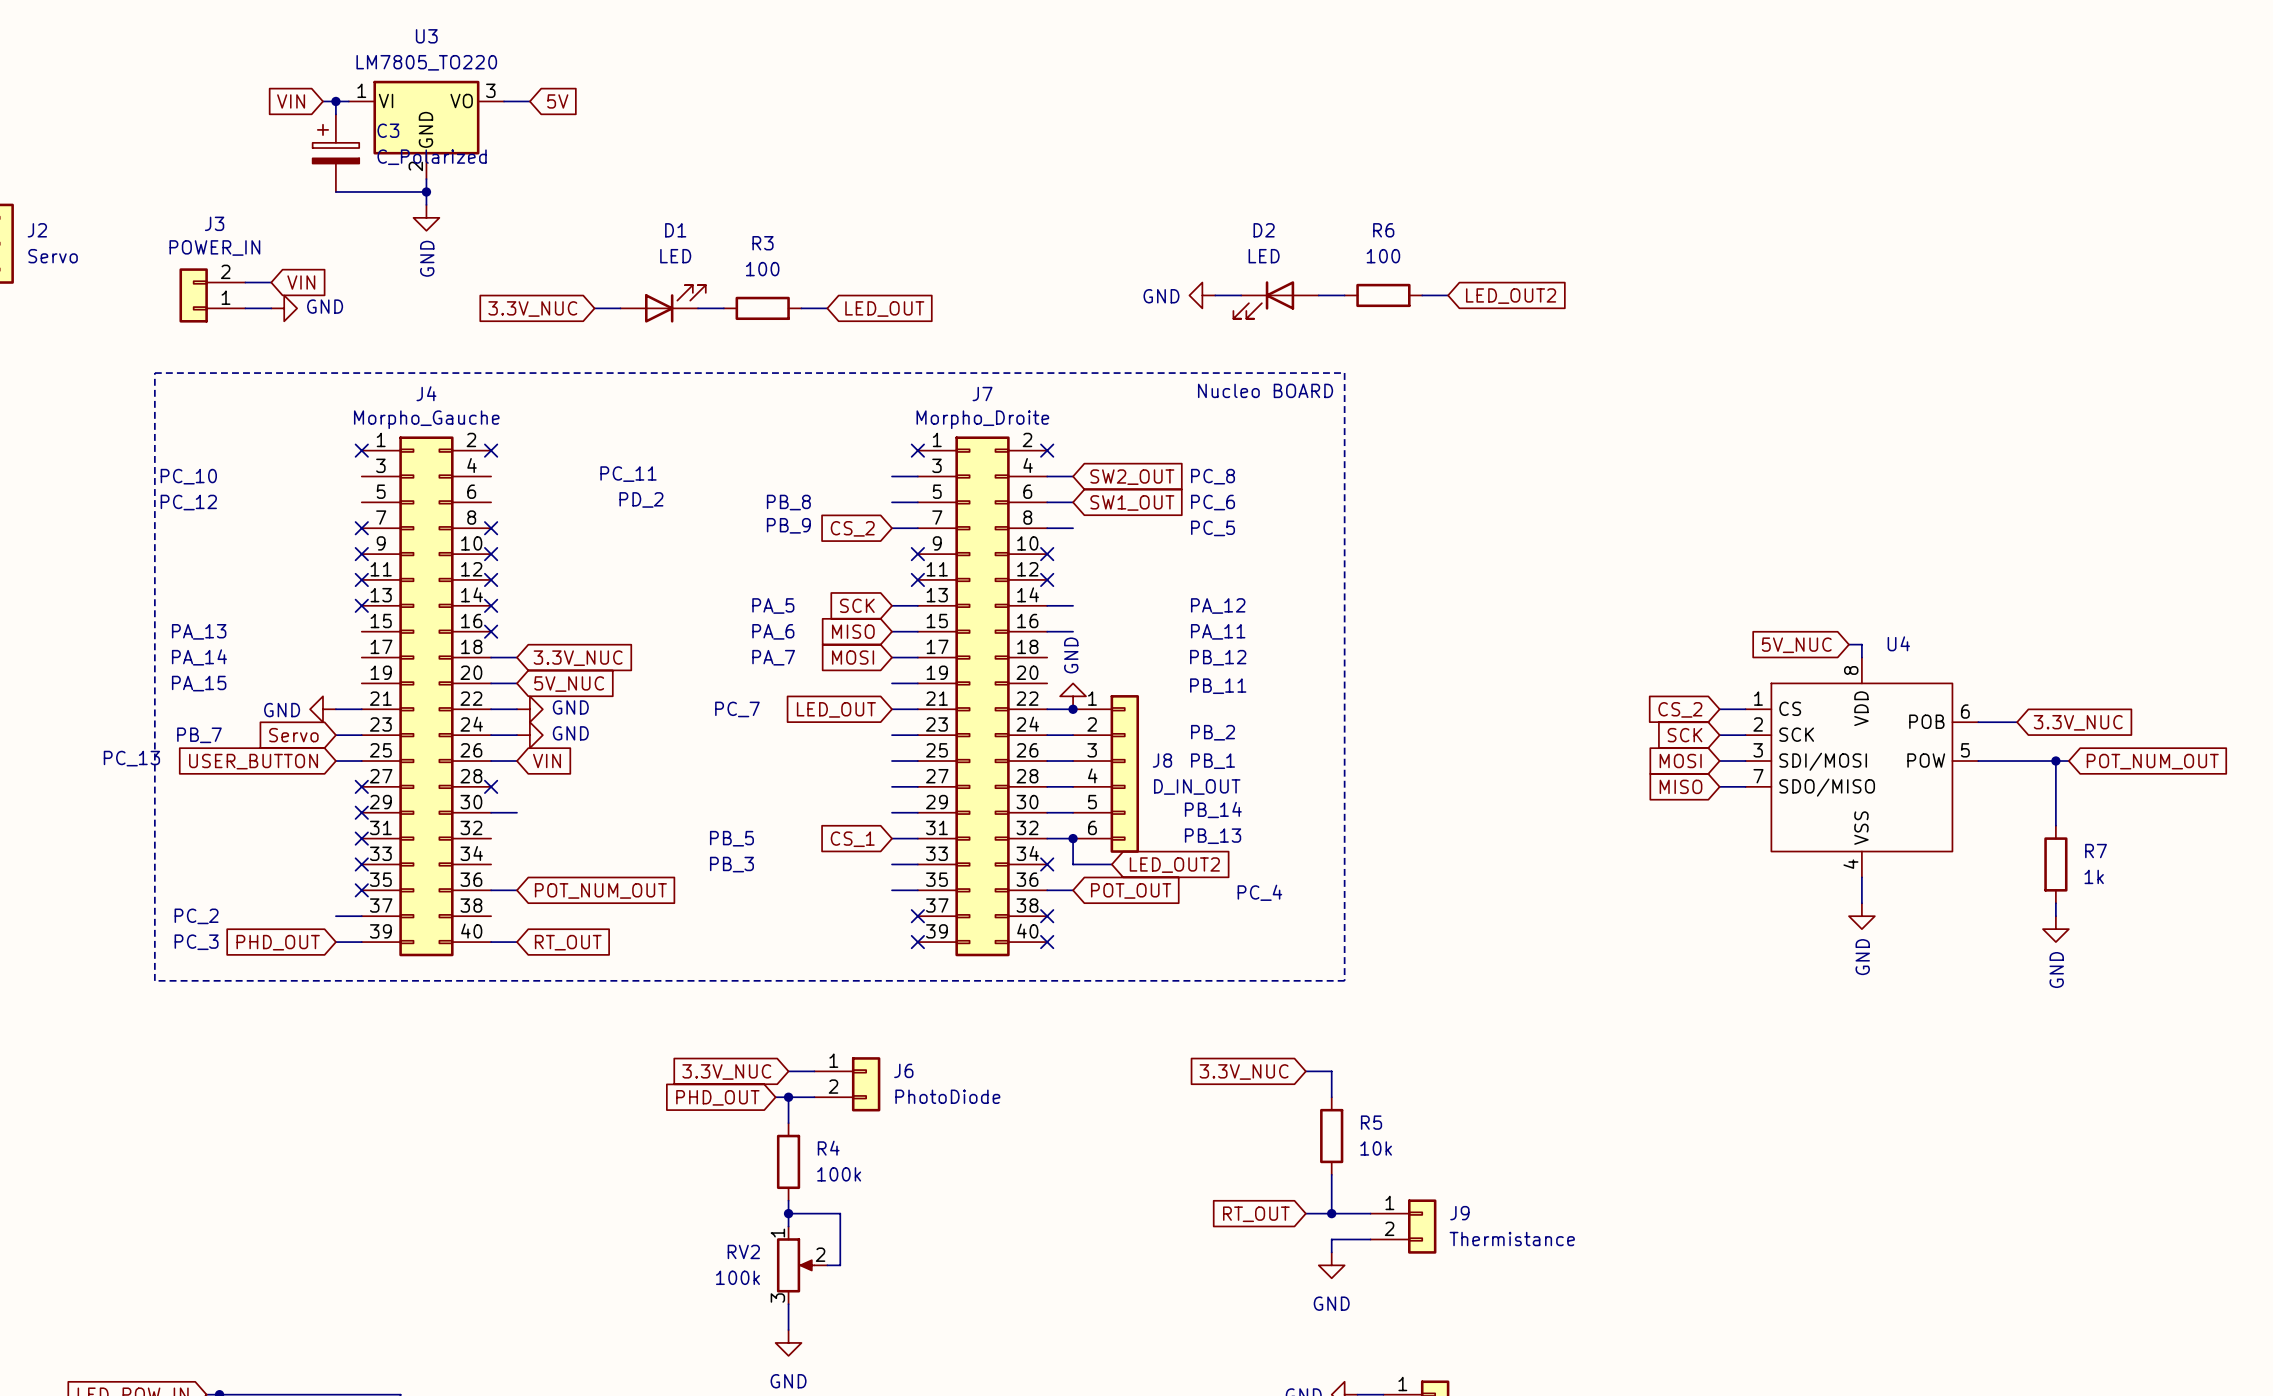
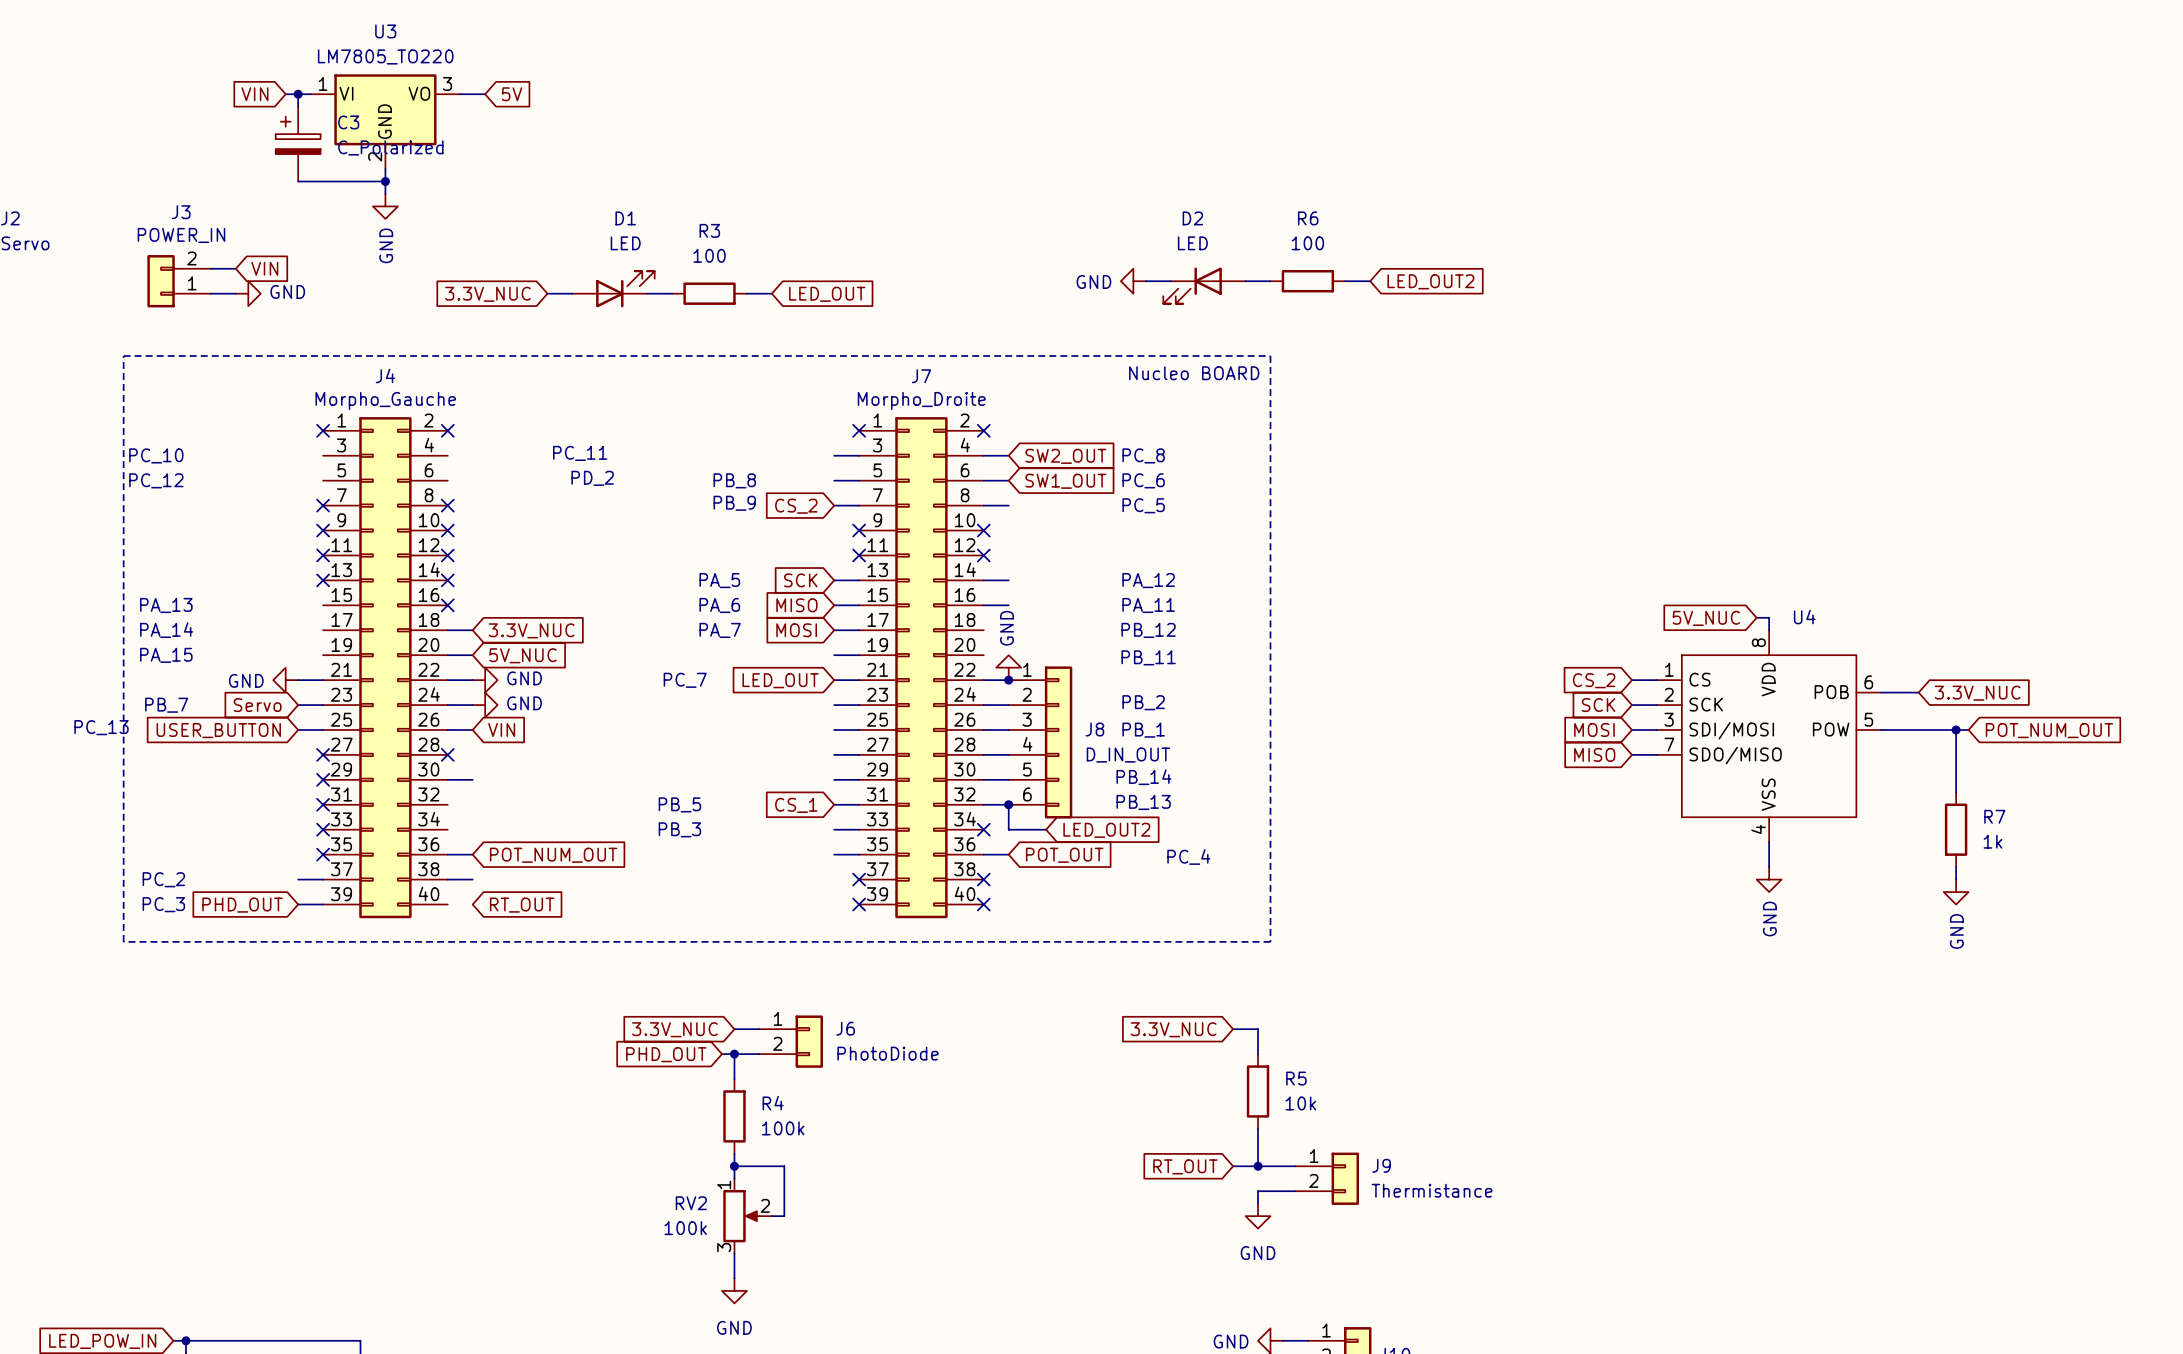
wire: (491, 942) (516, 942) -> (447, 879) (472, 879)

